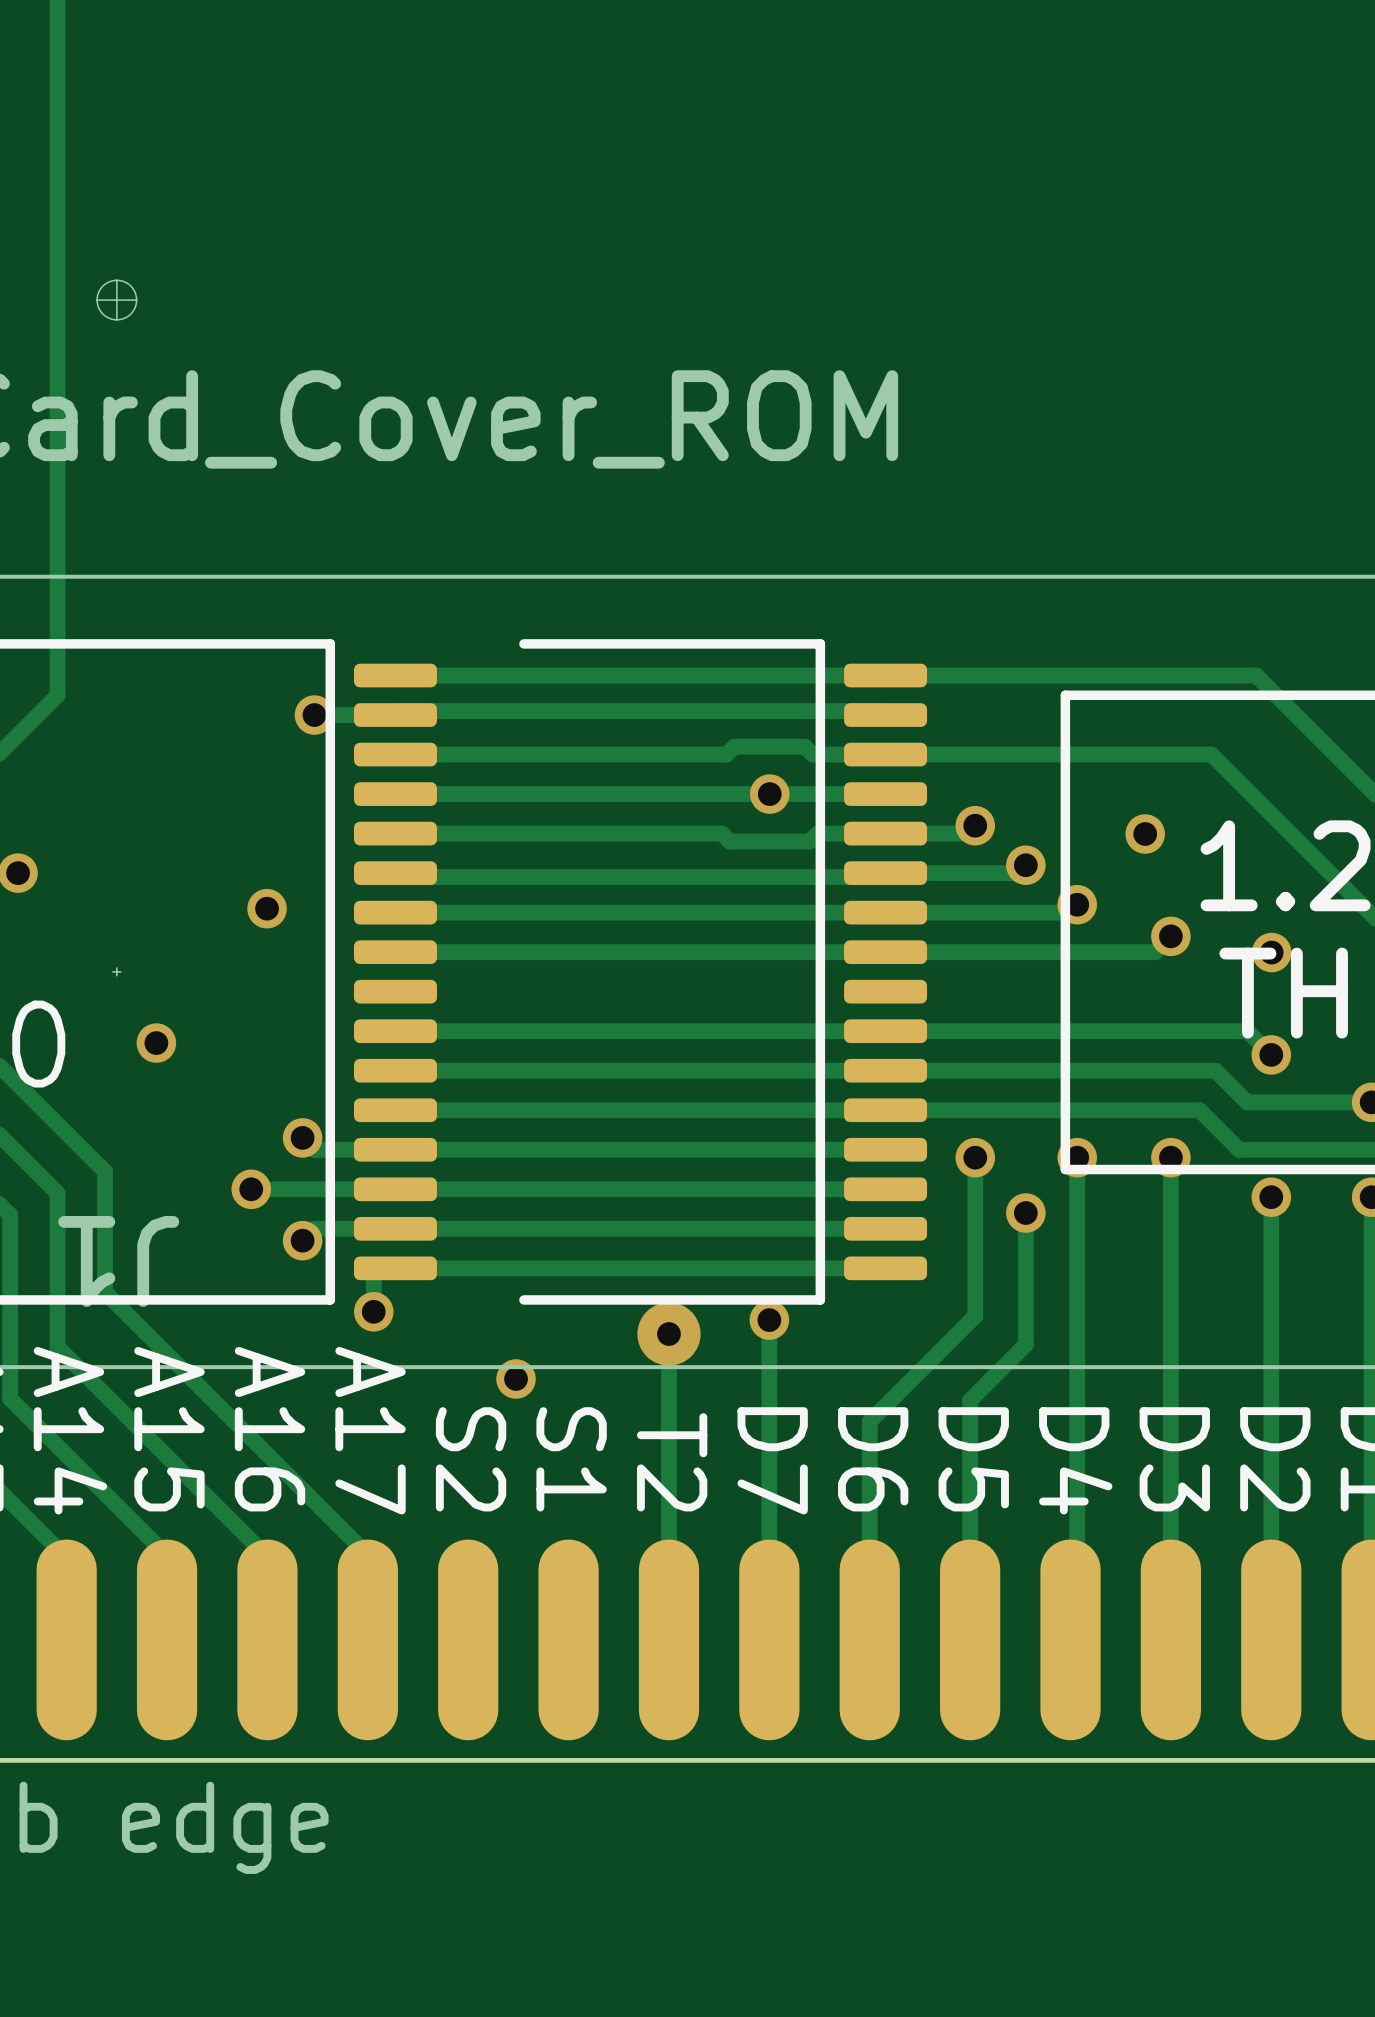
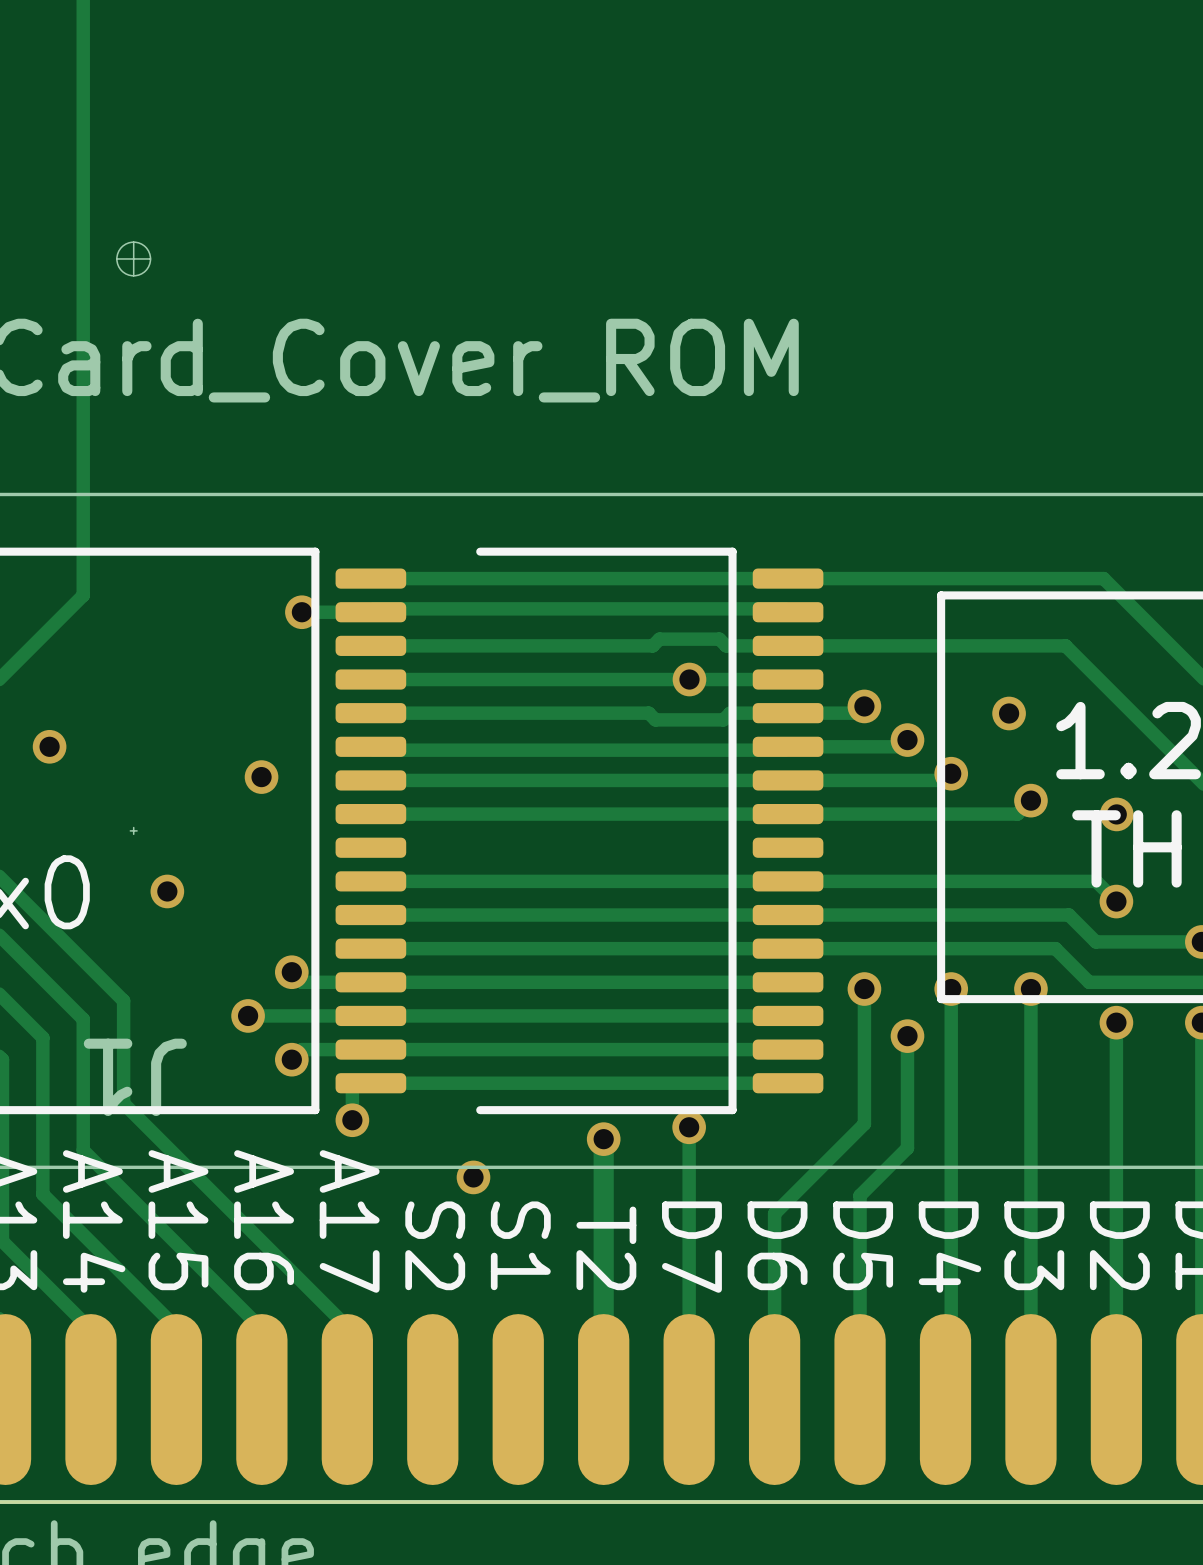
via size: [637, 1302, 701, 1366] -> [586, 1122, 621, 1156]
track width: thin (668, 1334) (668, 1639) -> thick (603, 1139) (603, 1399)

